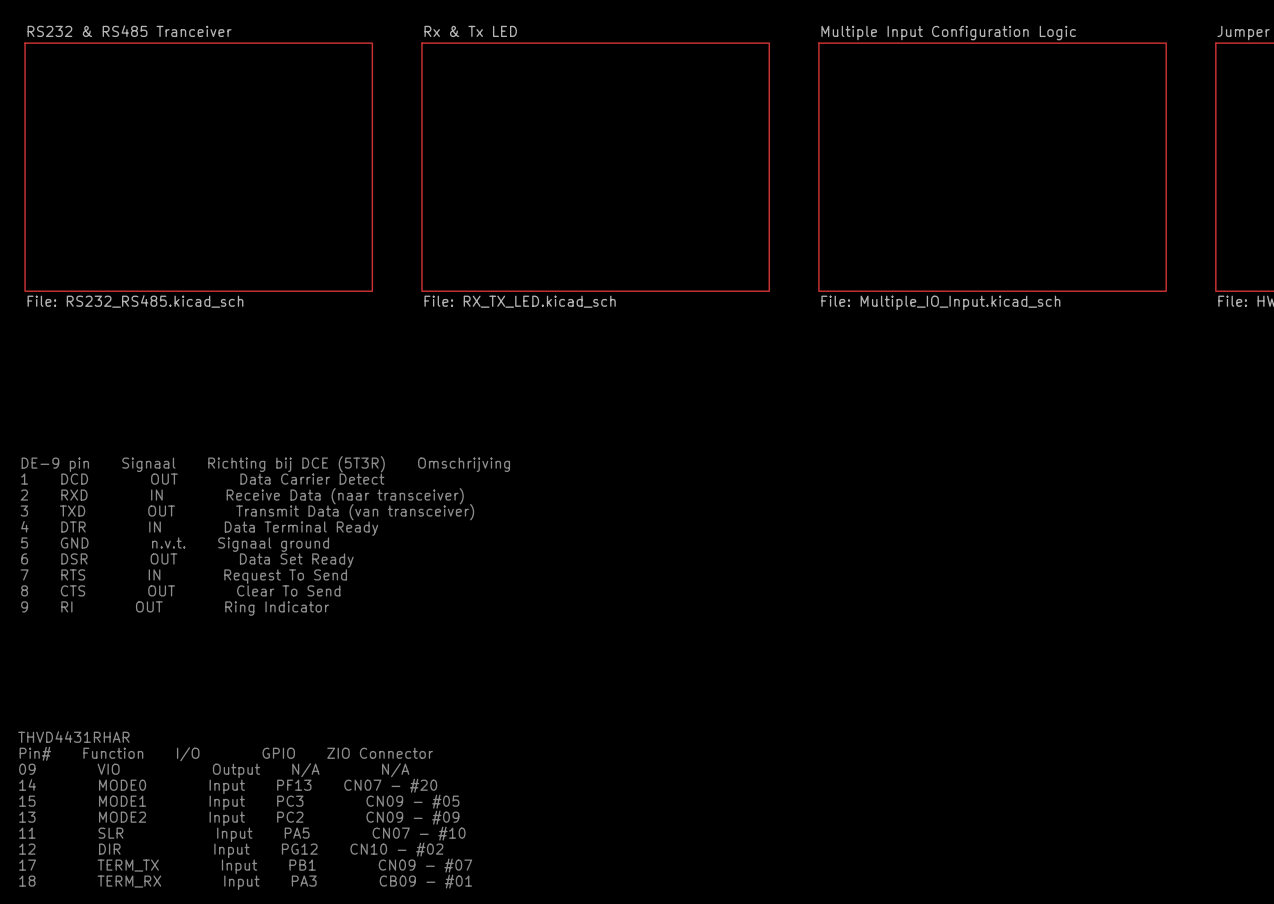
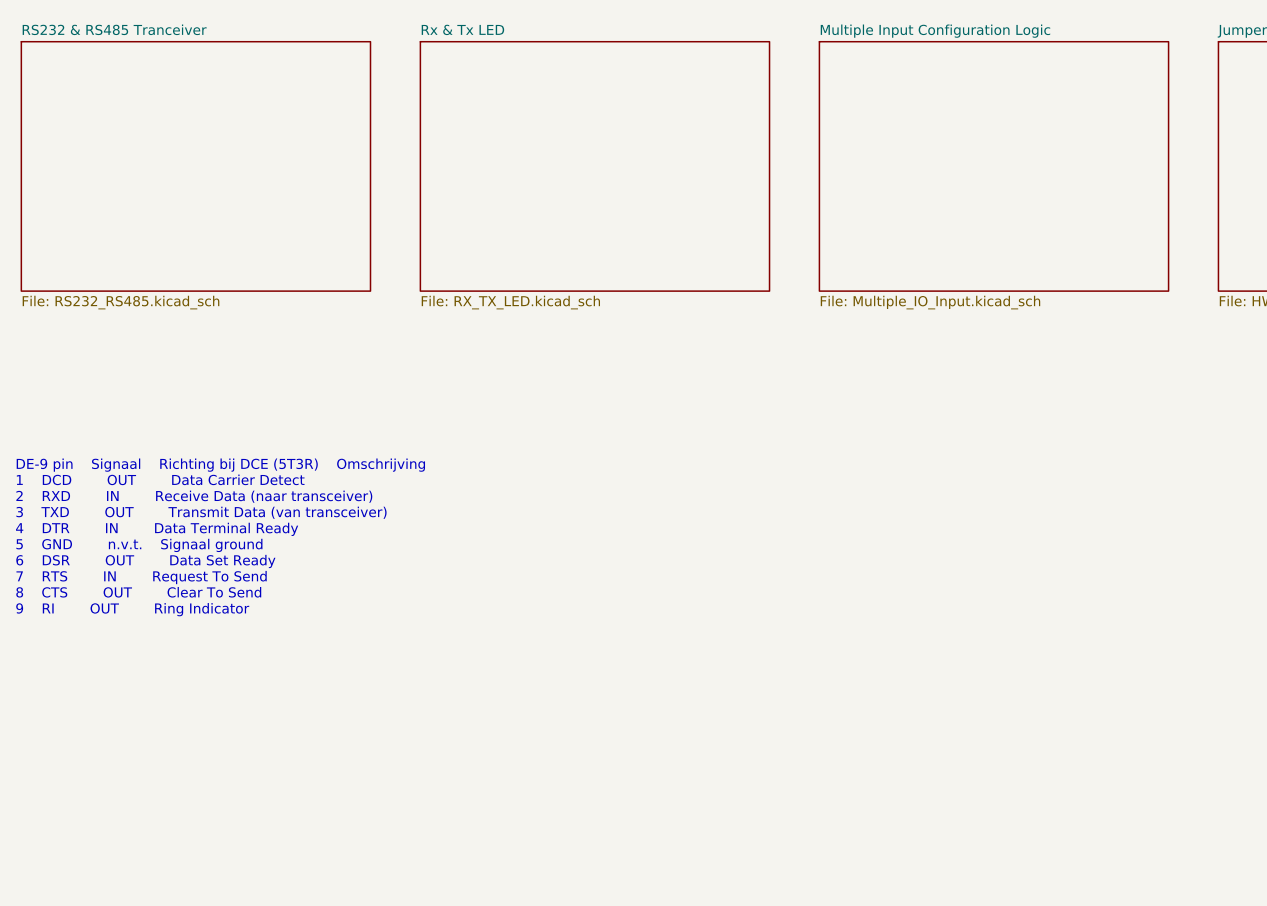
text: THVD4431RHAR (73, 737) -> none
text: Pin# Function I/O GPIO ZIO Connector (226, 753) -> none
text: 09 VIO Output N/A N/A (214, 770) -> none
text: 14 MODE0 Input PF13 CN07 - #20 (228, 786) -> none
text: 15 MODE1 Input PC3 CN09 - #05 (239, 802) -> none
text: 13 MODE2 Input PC2 CN09 - #09 (239, 818) -> none
text: 11 SLR Input PA5 CN07 - #10 (242, 834) -> none
text: 12 DIR Input PG12 CN10 - #02 (231, 850) -> none
text: 17 TERM_TX Input PB1 CN09 - #07 (245, 866) -> none
text: 18 TERM_RX Input PA3 CB09 - #01 (245, 882) -> none

